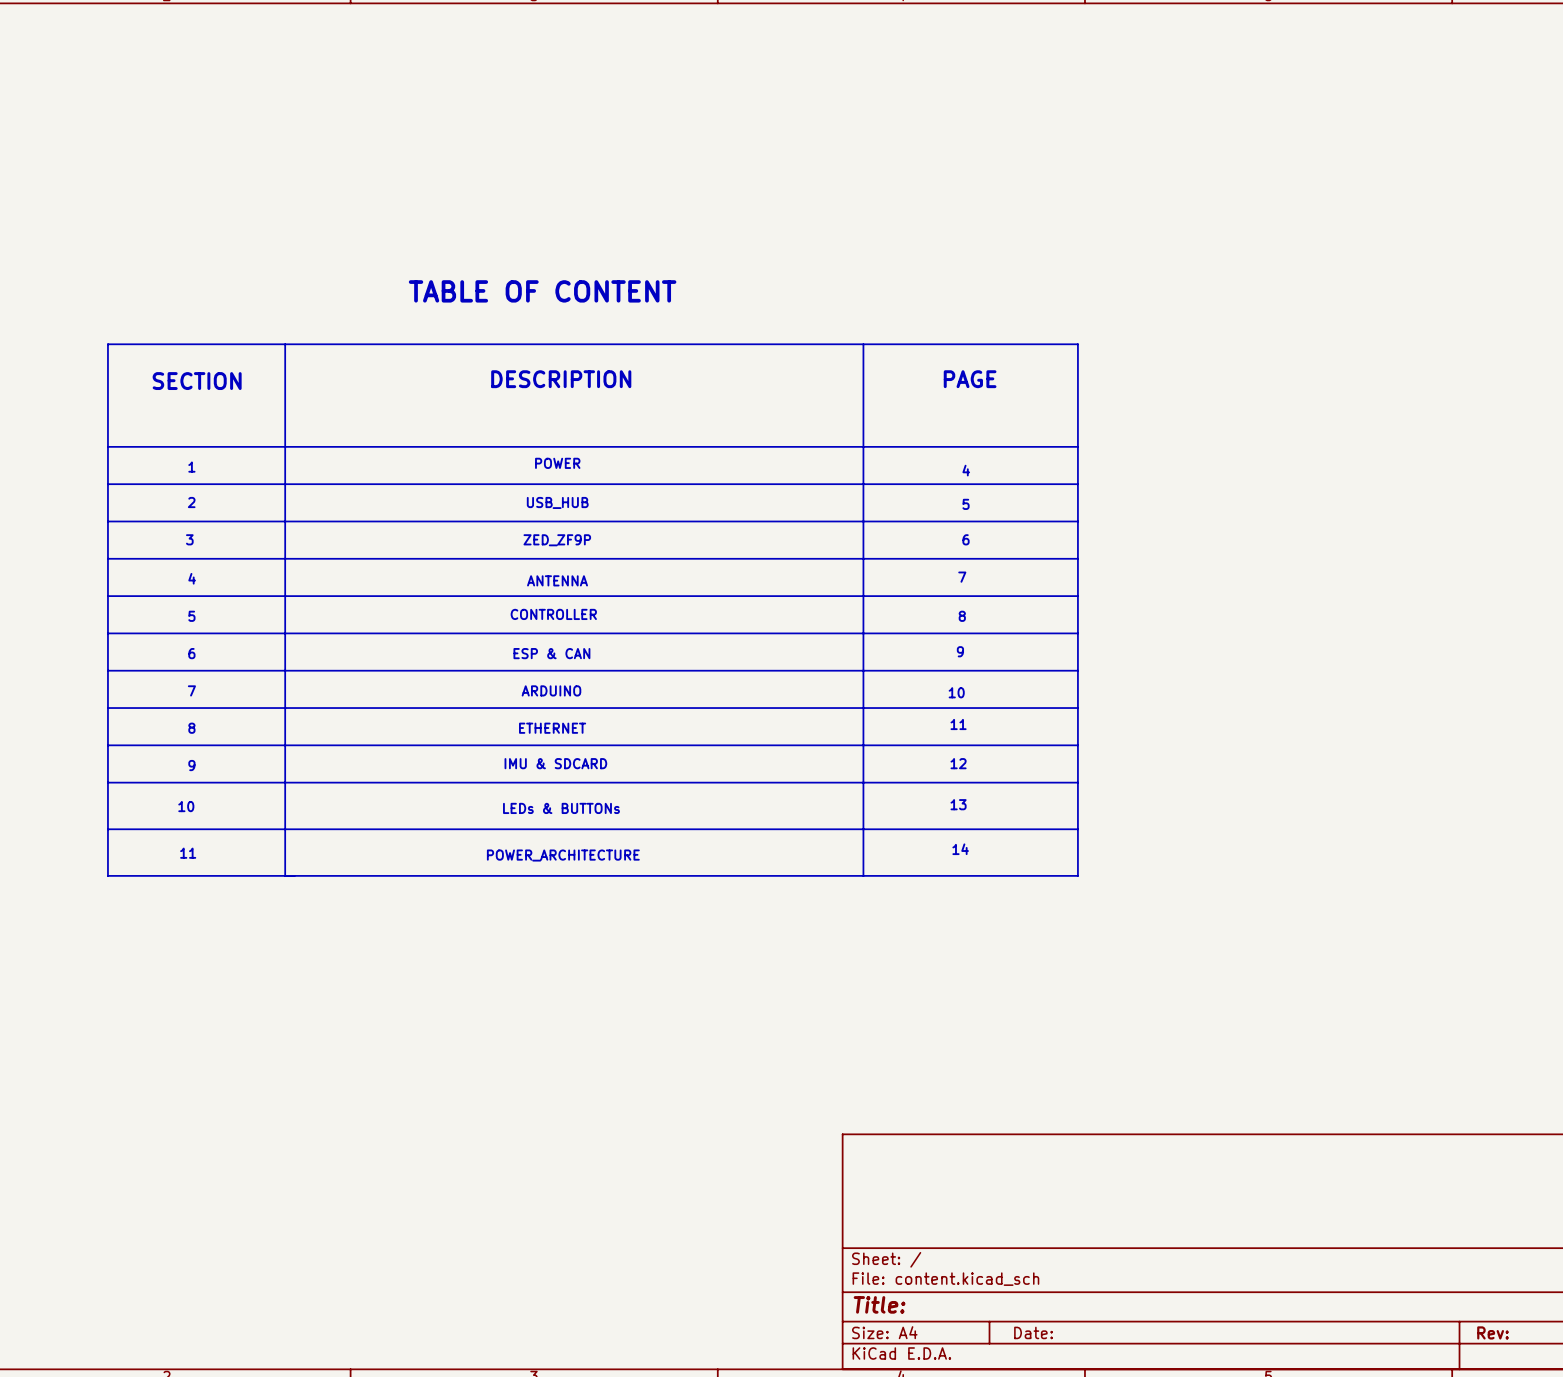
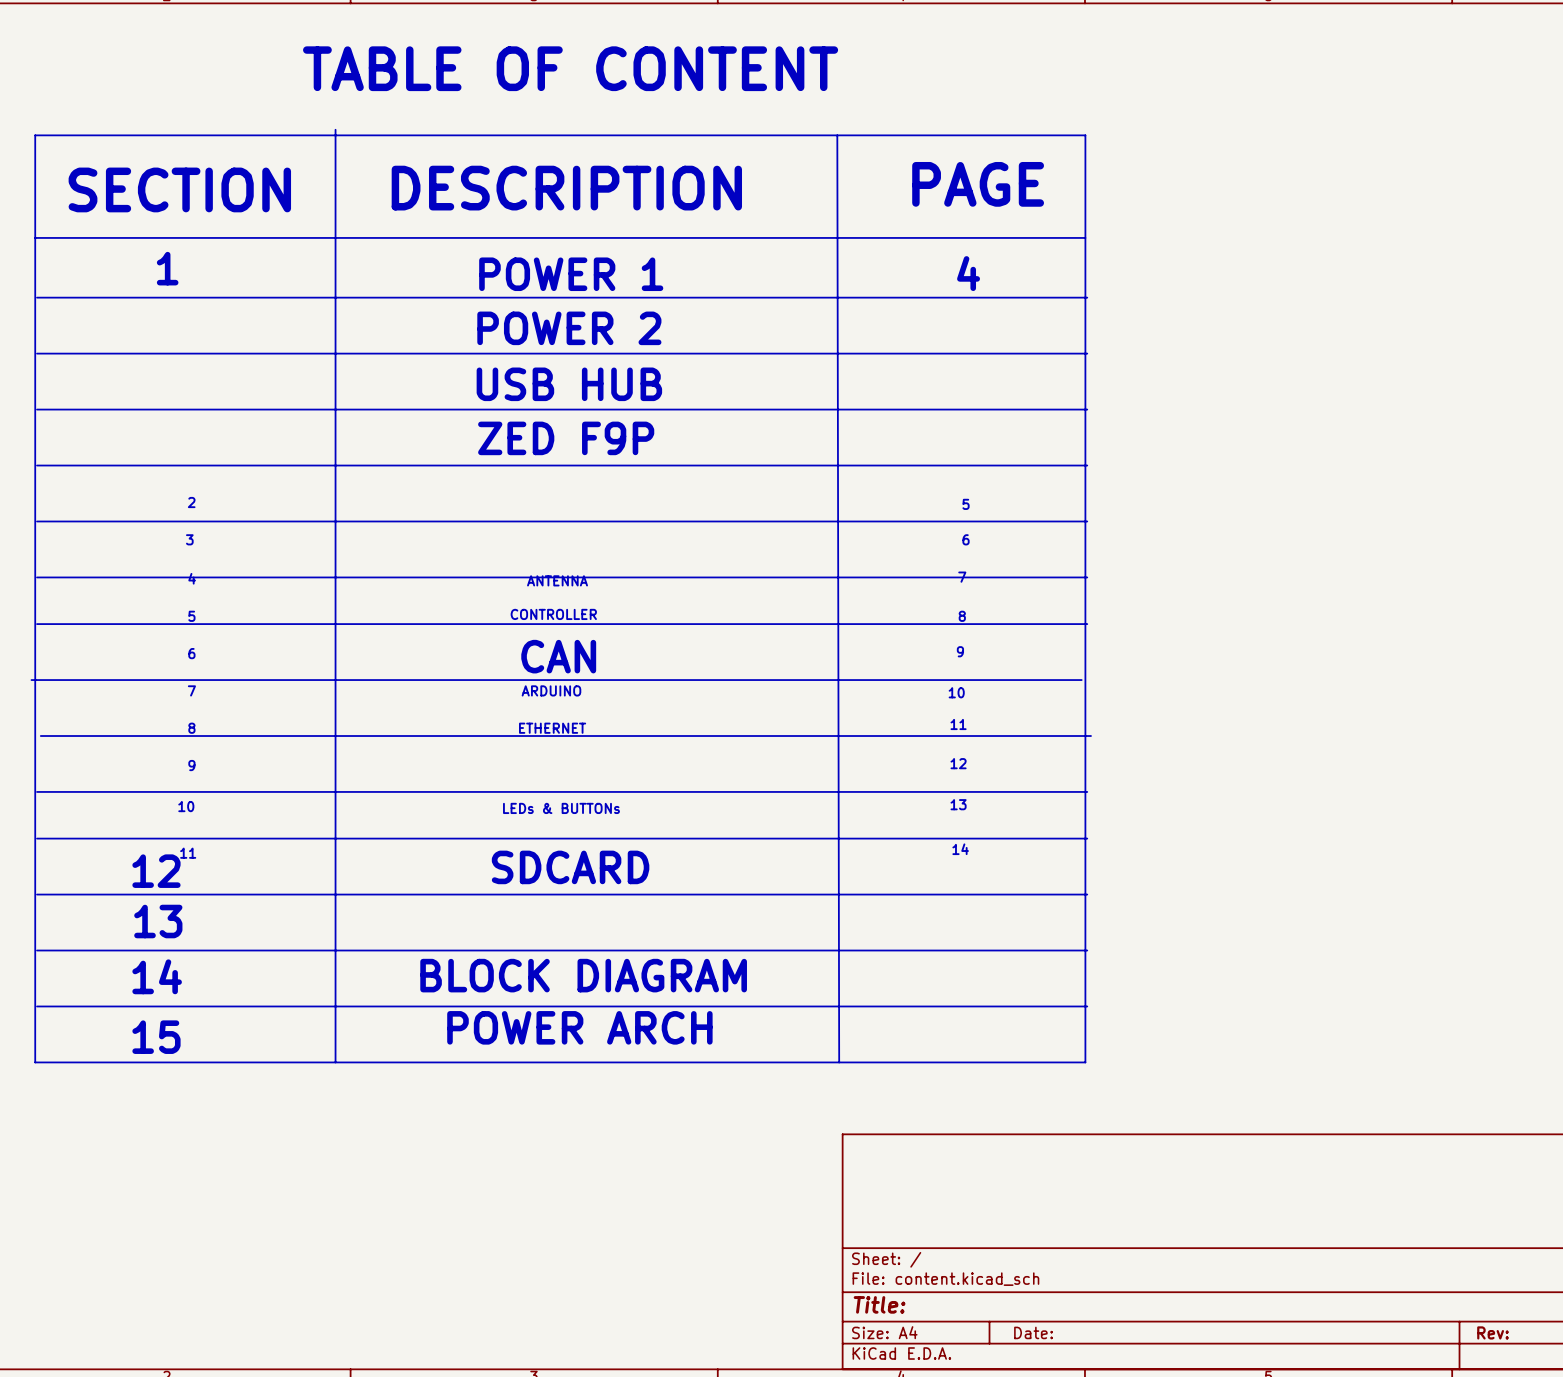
text: none -> TABLE OF CONTENT (570, 68)
line: none -> (335, 129) (335, 1062)
line: none -> (837, 135) (839, 1062)
text: none -> PAGE (978, 184)
text: none -> DESCRIPTION (566, 188)
text: none -> SECTION (179, 189)
line: none -> (35, 237) (1085, 237)
text: none -> 1 (167, 268)
text: none -> 4 (968, 273)
text: none -> POWER 1 (571, 274)
text: TABLE OF CONTENT (542, 291) -> none
line: none -> (37, 297) (1087, 297)
text: none -> POWER 2 (569, 328)
line: (107, 344) (1077, 344) (1077, 875) (107, 875) (107, 344) -> (35, 135) (35, 1062) (1085, 1062) (1085, 135) (35, 135)
line: (285, 344) (285, 875) -> none
line: (863, 344) (863, 875) -> none
line: none -> (37, 353) (1087, 353)
text: DESCRIPTION (561, 379) -> none
text: PAGE (970, 379) -> none
text: SECTION (197, 381) -> none
text: none -> USB HUB (569, 384)
line: none -> (37, 409) (1087, 409)
text: none -> ZED F9P (566, 438)
line: (107, 446) (1077, 446) -> none
text: POWER (557, 463) -> none
line: none -> (37, 465) (1087, 465)
text: 1 (191, 467) -> none
text: 4 (966, 470) -> none
line: (107, 484) (1077, 484) -> none
text: USB_HUB (557, 502) -> none
line: none -> (37, 521) (107, 521)
line: none -> (1077, 521) (1087, 521)
text: ZED_ZF9P (557, 540) -> none
line: (107, 558) (1077, 558) -> none
line: none -> (37, 577) (1087, 577)
line: (107, 596) (1077, 596) -> none
line: none -> (37, 624) (1087, 624)
line: (107, 633) (1077, 633) -> none
text: ESP & CAN (551, 653) -> none
text: none -> CAN (558, 656)
line: (107, 670) (1077, 670) -> none
line: none -> (31, 680) (1081, 680)
line: (107, 708) (1077, 708) -> none
line: none -> (40, 736) (1091, 736)
line: (107, 745) (1077, 745) -> none
text: IMU & SDCARD (555, 763) -> none
line: (107, 782) (1077, 782) -> none
line: none -> (37, 791) (1087, 791)
line: (107, 829) (1077, 829) -> none
line: none -> (37, 838) (1087, 838)
text: POWER_ARCHITECTURE (563, 855) -> none
text: none -> SDCARD (570, 867)
text: none -> 12 (156, 871)
line: none -> (37, 894) (1087, 894)
text: none -> 13 (158, 921)
line: none -> (37, 950) (1087, 950)
text: none -> BLOCK DIAGRAM (583, 975)
text: none -> 14 (157, 976)
line: none -> (37, 1006) (1087, 1006)
text: none -> POWER ARCH (579, 1027)
text: none -> 15 (156, 1037)

